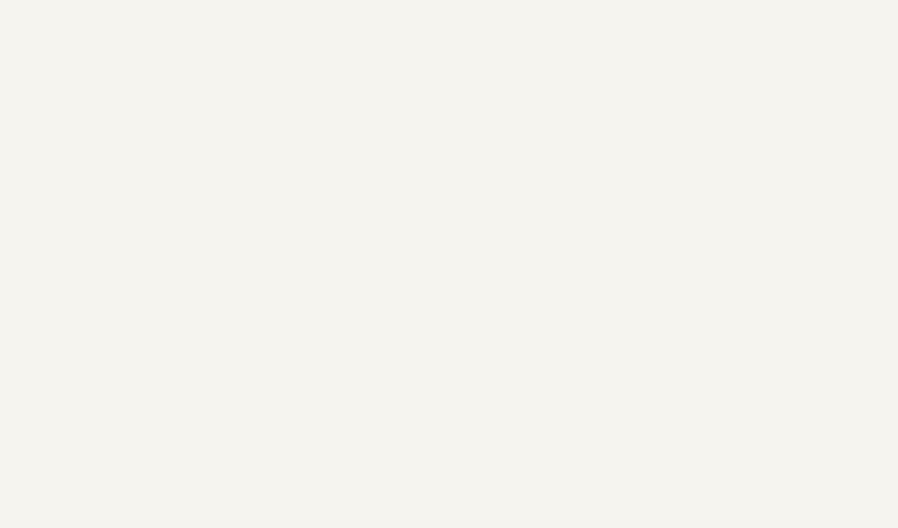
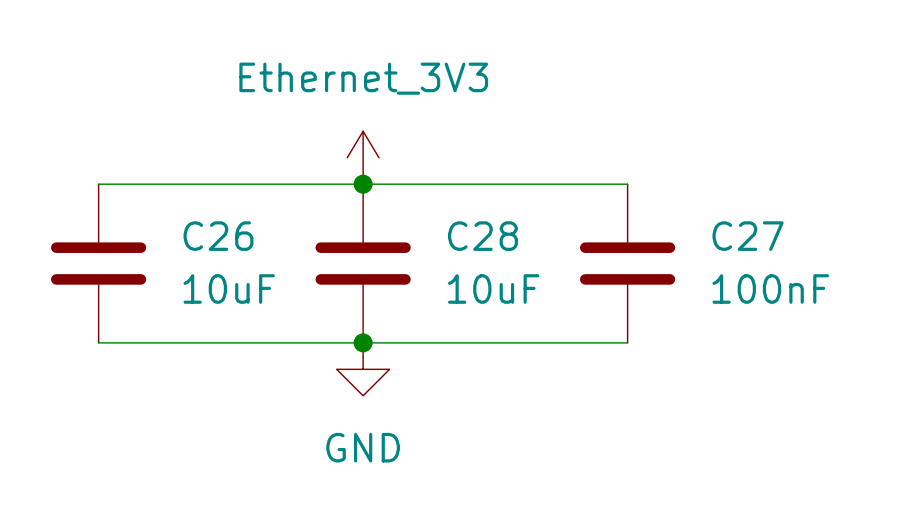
power symbol: none -> Ethernet_3V3 (363, 157)
wire: none -> (98, 184) (627, 184)
junction: none -> (363, 184)
C26: none -> 10uF (98, 263)
C28: none -> 10uF (363, 263)
C27: none -> 100nF (627, 263)
wire: none -> (98, 342) (627, 342)
junction: none -> (363, 342)
power symbol: none -> GND (363, 369)

